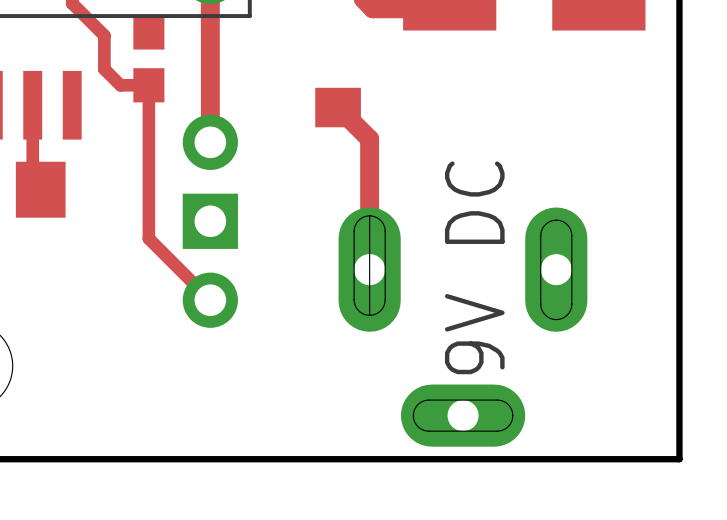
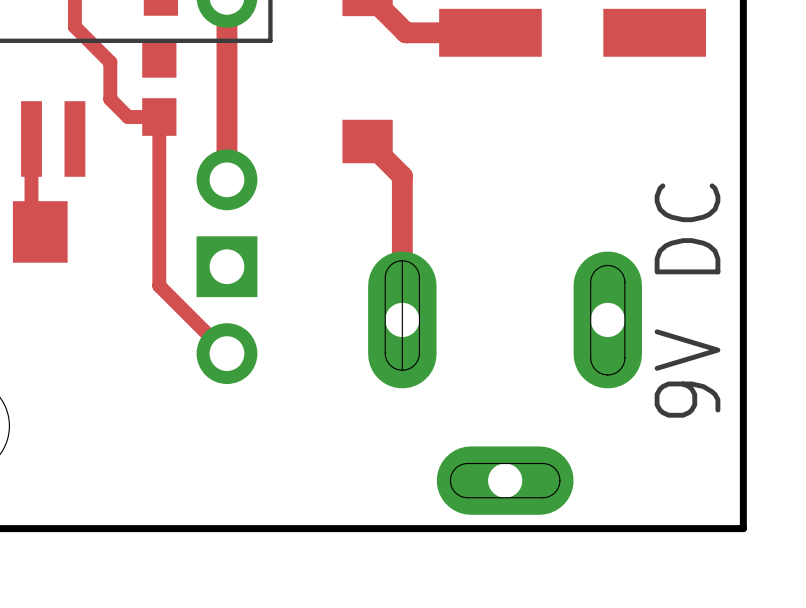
text position: 9V DC (474, 267) -> 9V DC (687, 300)

